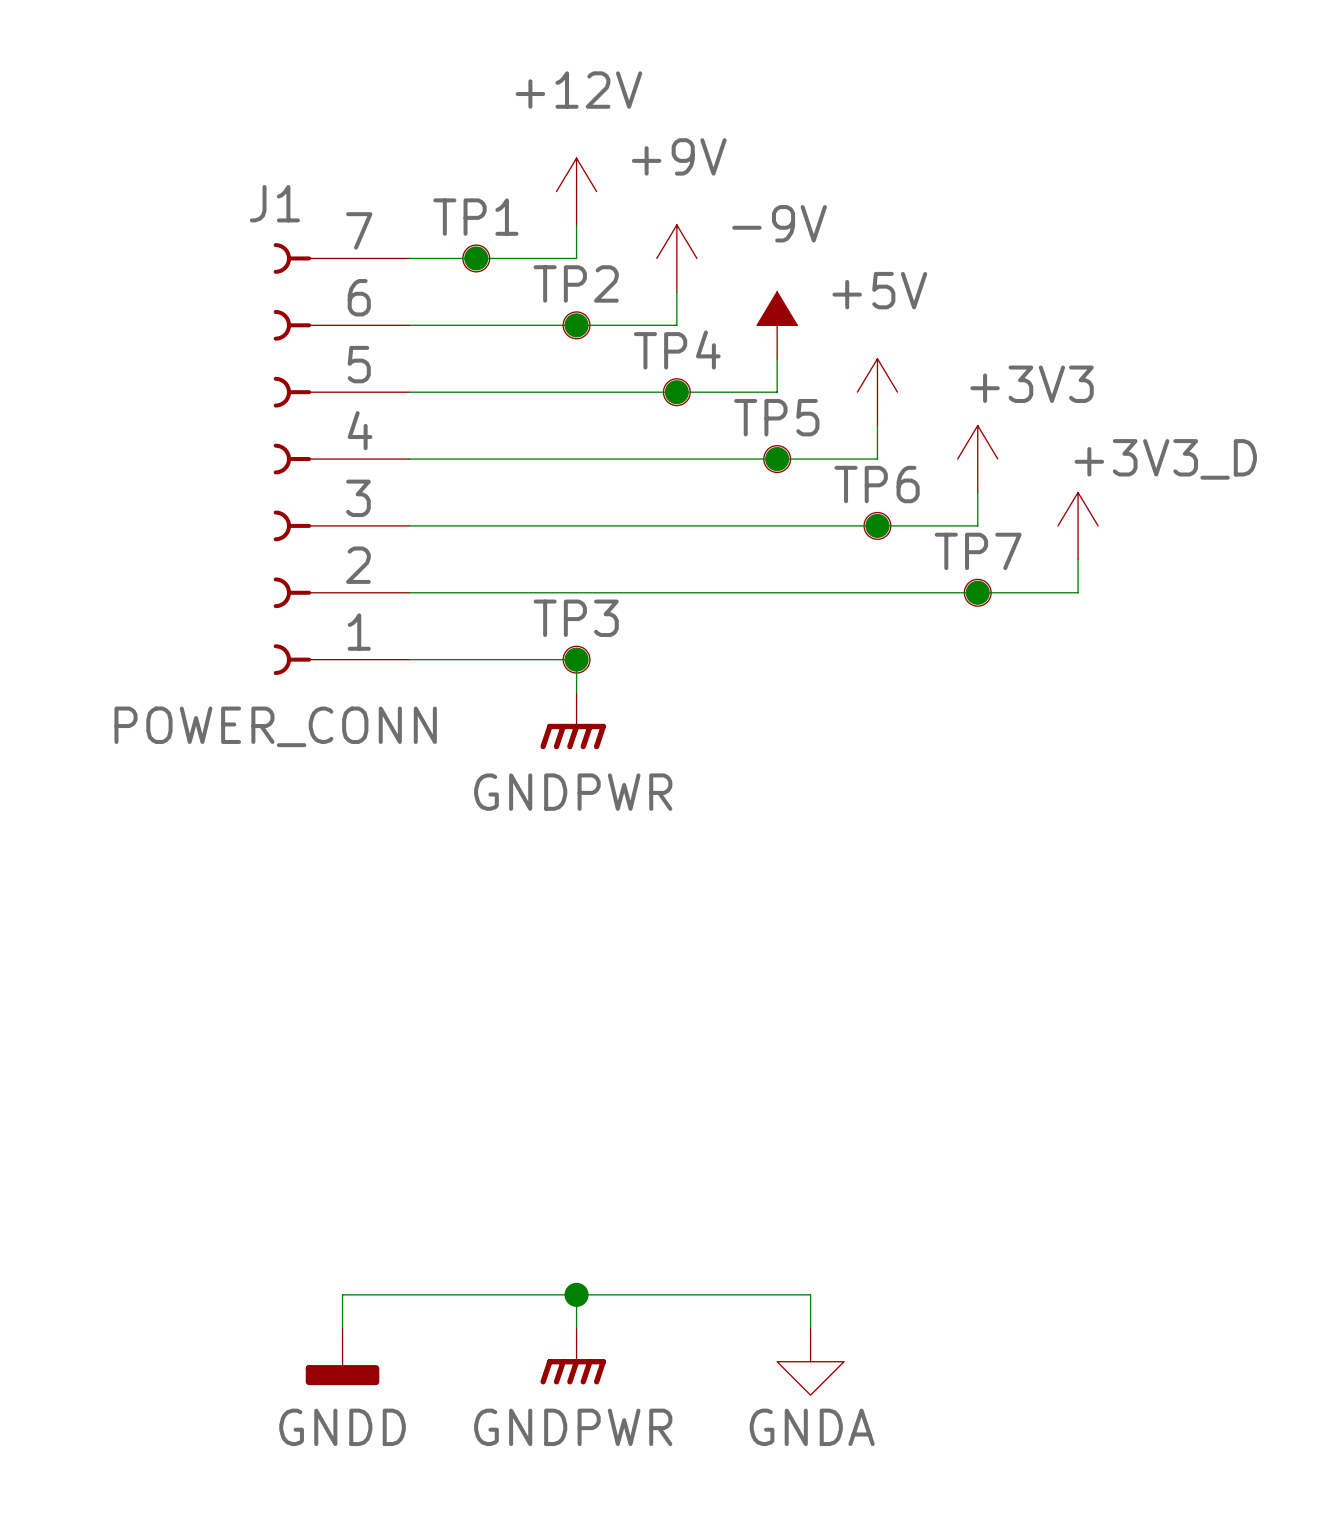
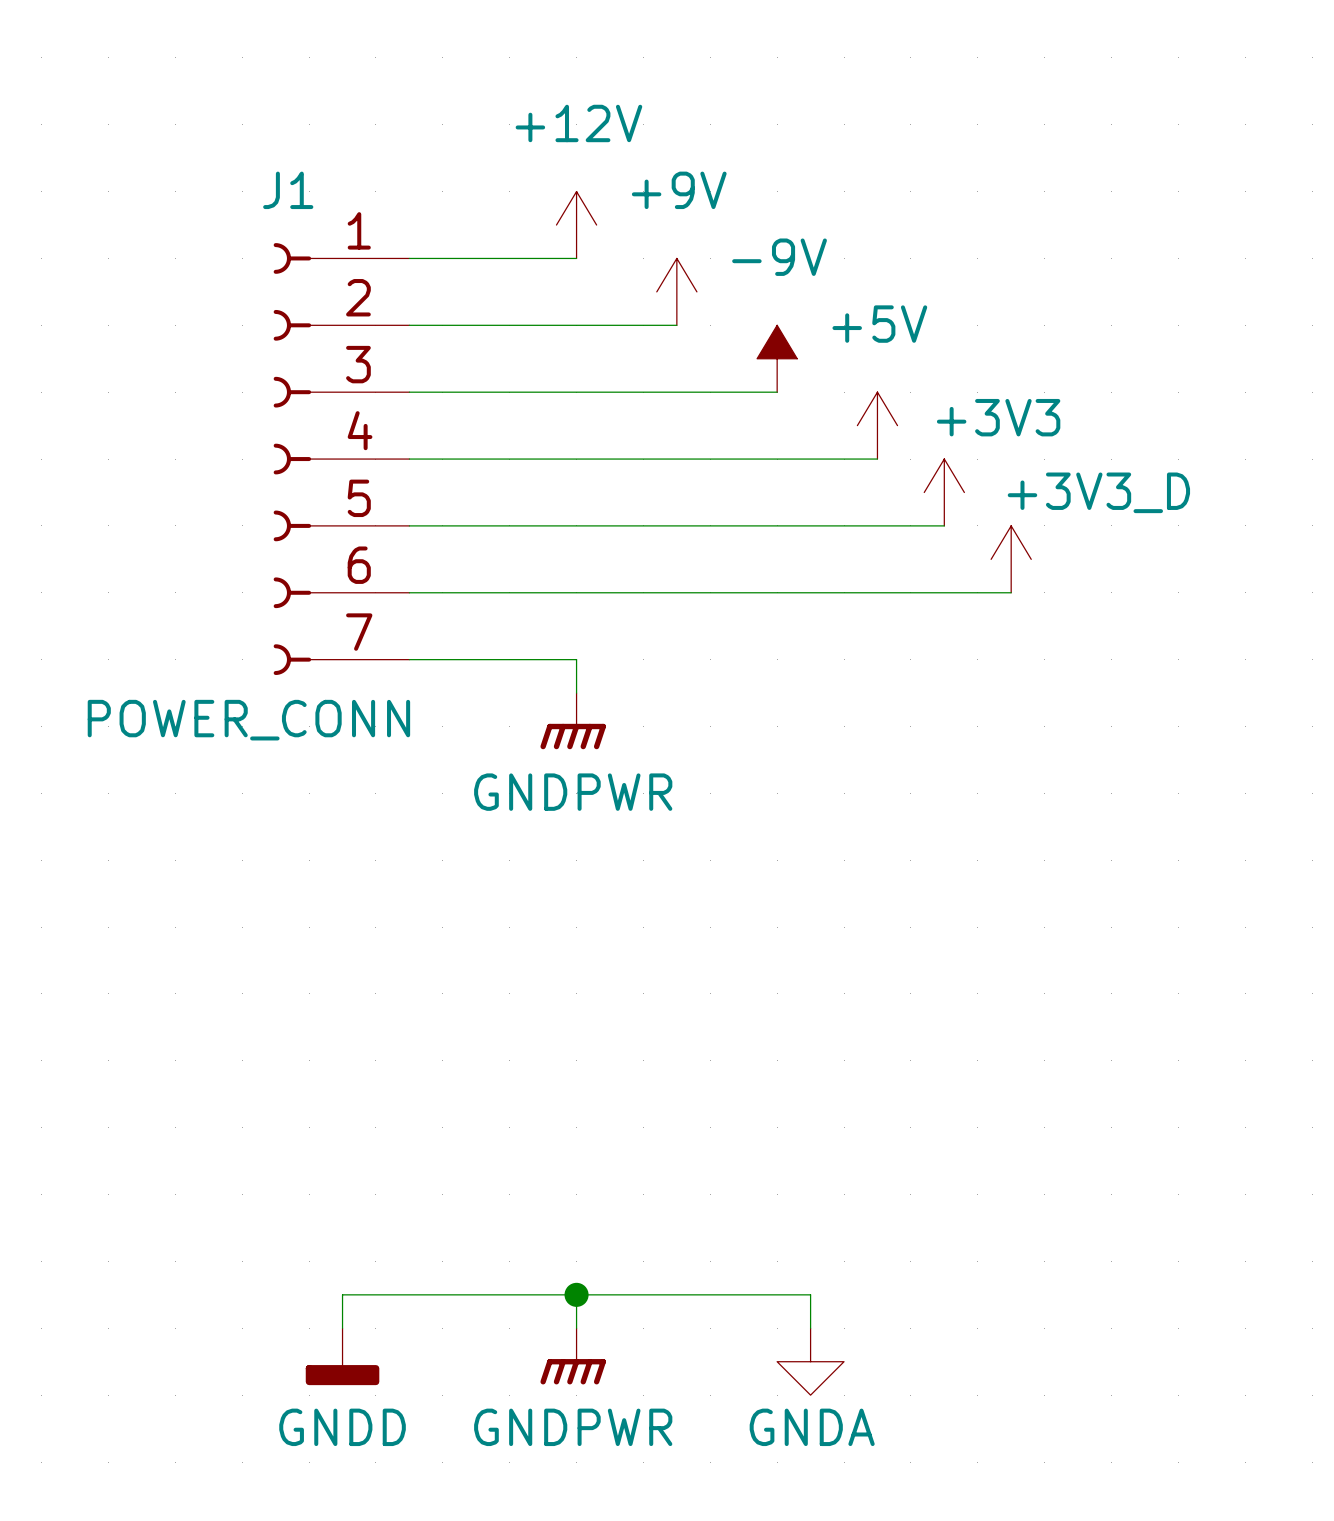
power symbol position: +12V (576, 191) -> +12V (576, 225)
junction: (476, 258) -> none
TP1: (476, 258) -> none
power symbol position: +9V (676, 258) -> +9V (676, 291)
junction: (576, 325) -> none
TP2: (576, 325) -> none
power symbol position: -9V (777, 325) -> -9V (777, 358)
junction: (676, 392) -> none
TP4: (676, 392) -> none
power symbol position: +5V (877, 392) -> +5V (877, 425)
J1 flip: as is (292, 459) -> up-down (292, 459)
junction: (777, 459) -> none
TP5: (777, 459) -> none
power symbol position: +3V3 (977, 459) -> +3V3 (944, 492)
wire: (977, 492) (977, 525) (944, 525) -> none
junction: (877, 525) -> none
TP6: (877, 525) -> none
power symbol position: +3V3_D (1078, 525) -> +3V3_D (1011, 559)
wire: (1078, 559) (1078, 592) (1011, 592) -> none
junction: (977, 592) -> none
TP7: (977, 592) -> none
junction: (576, 659) -> none
TP3: (576, 659) -> none

